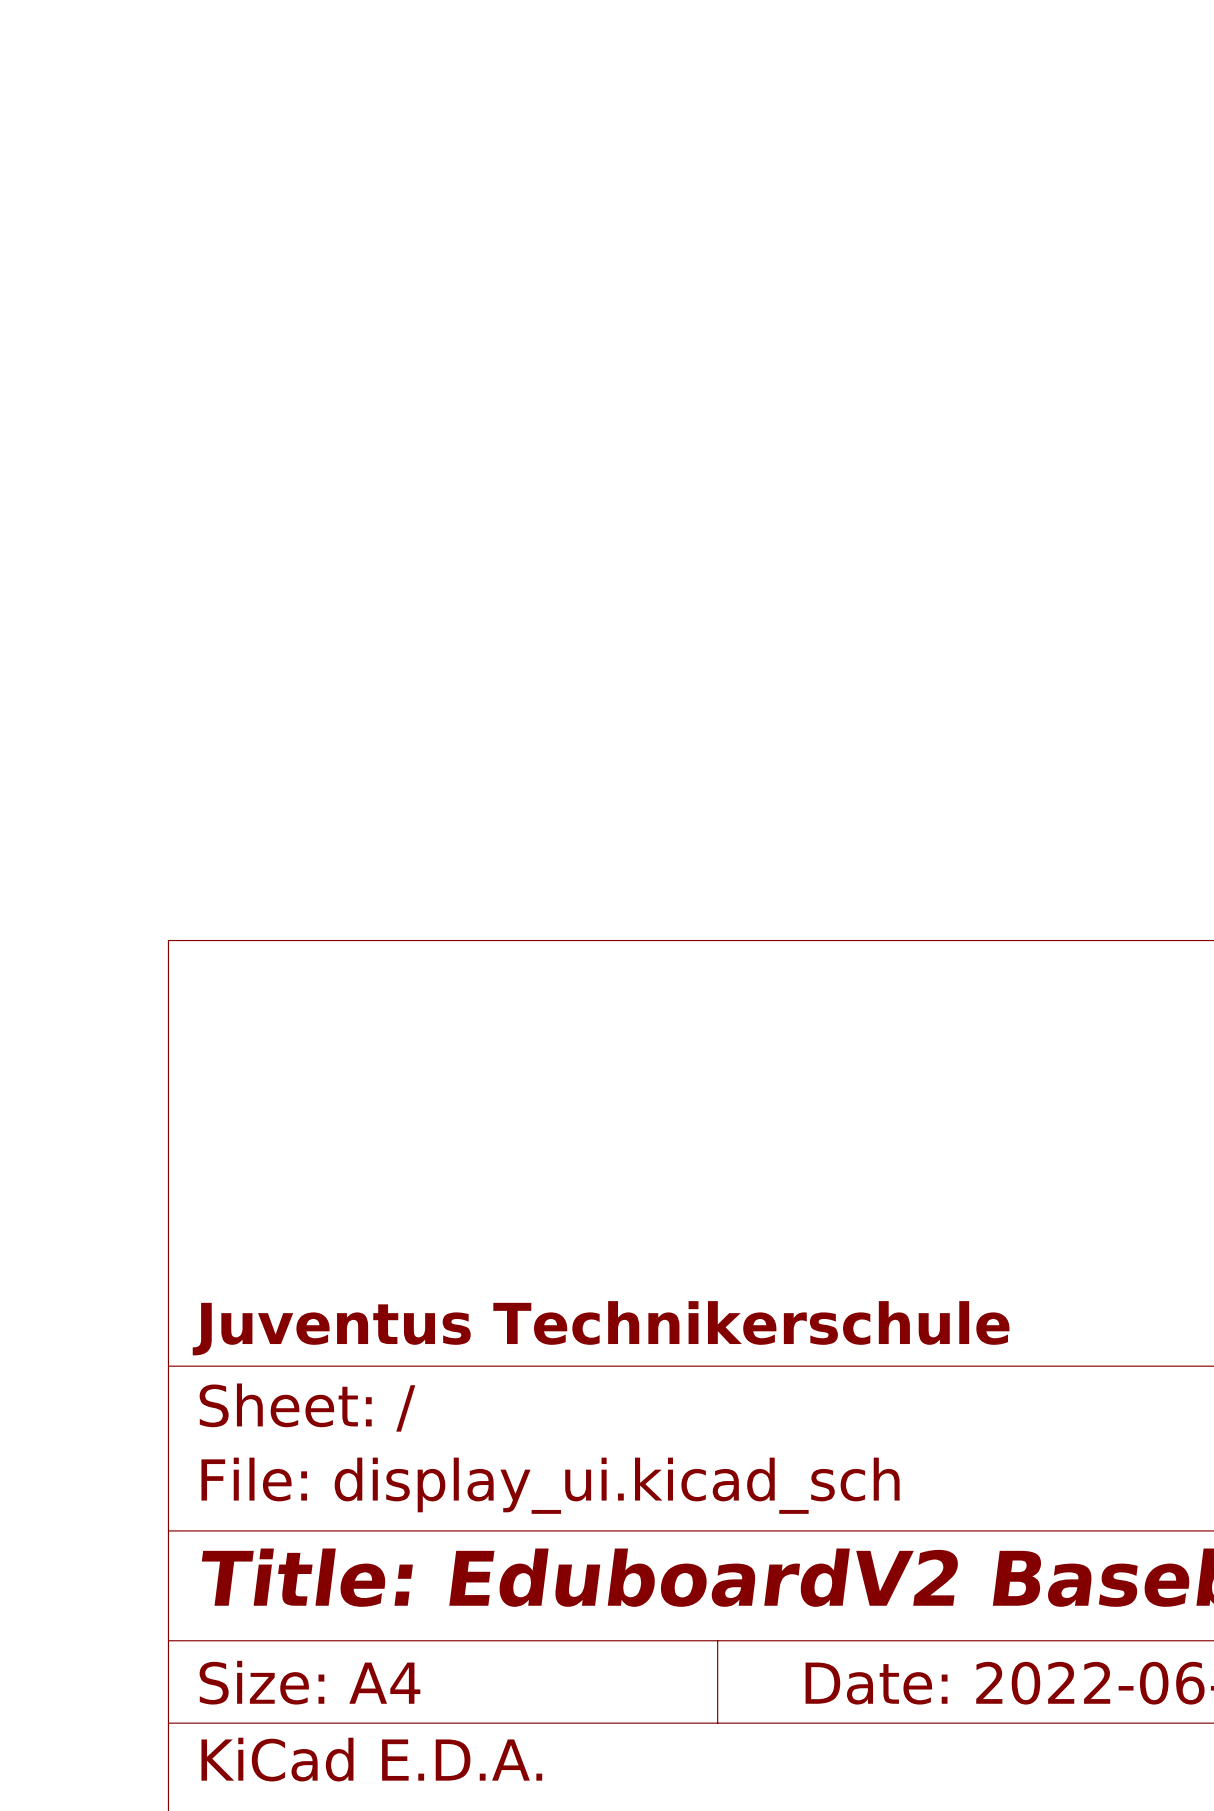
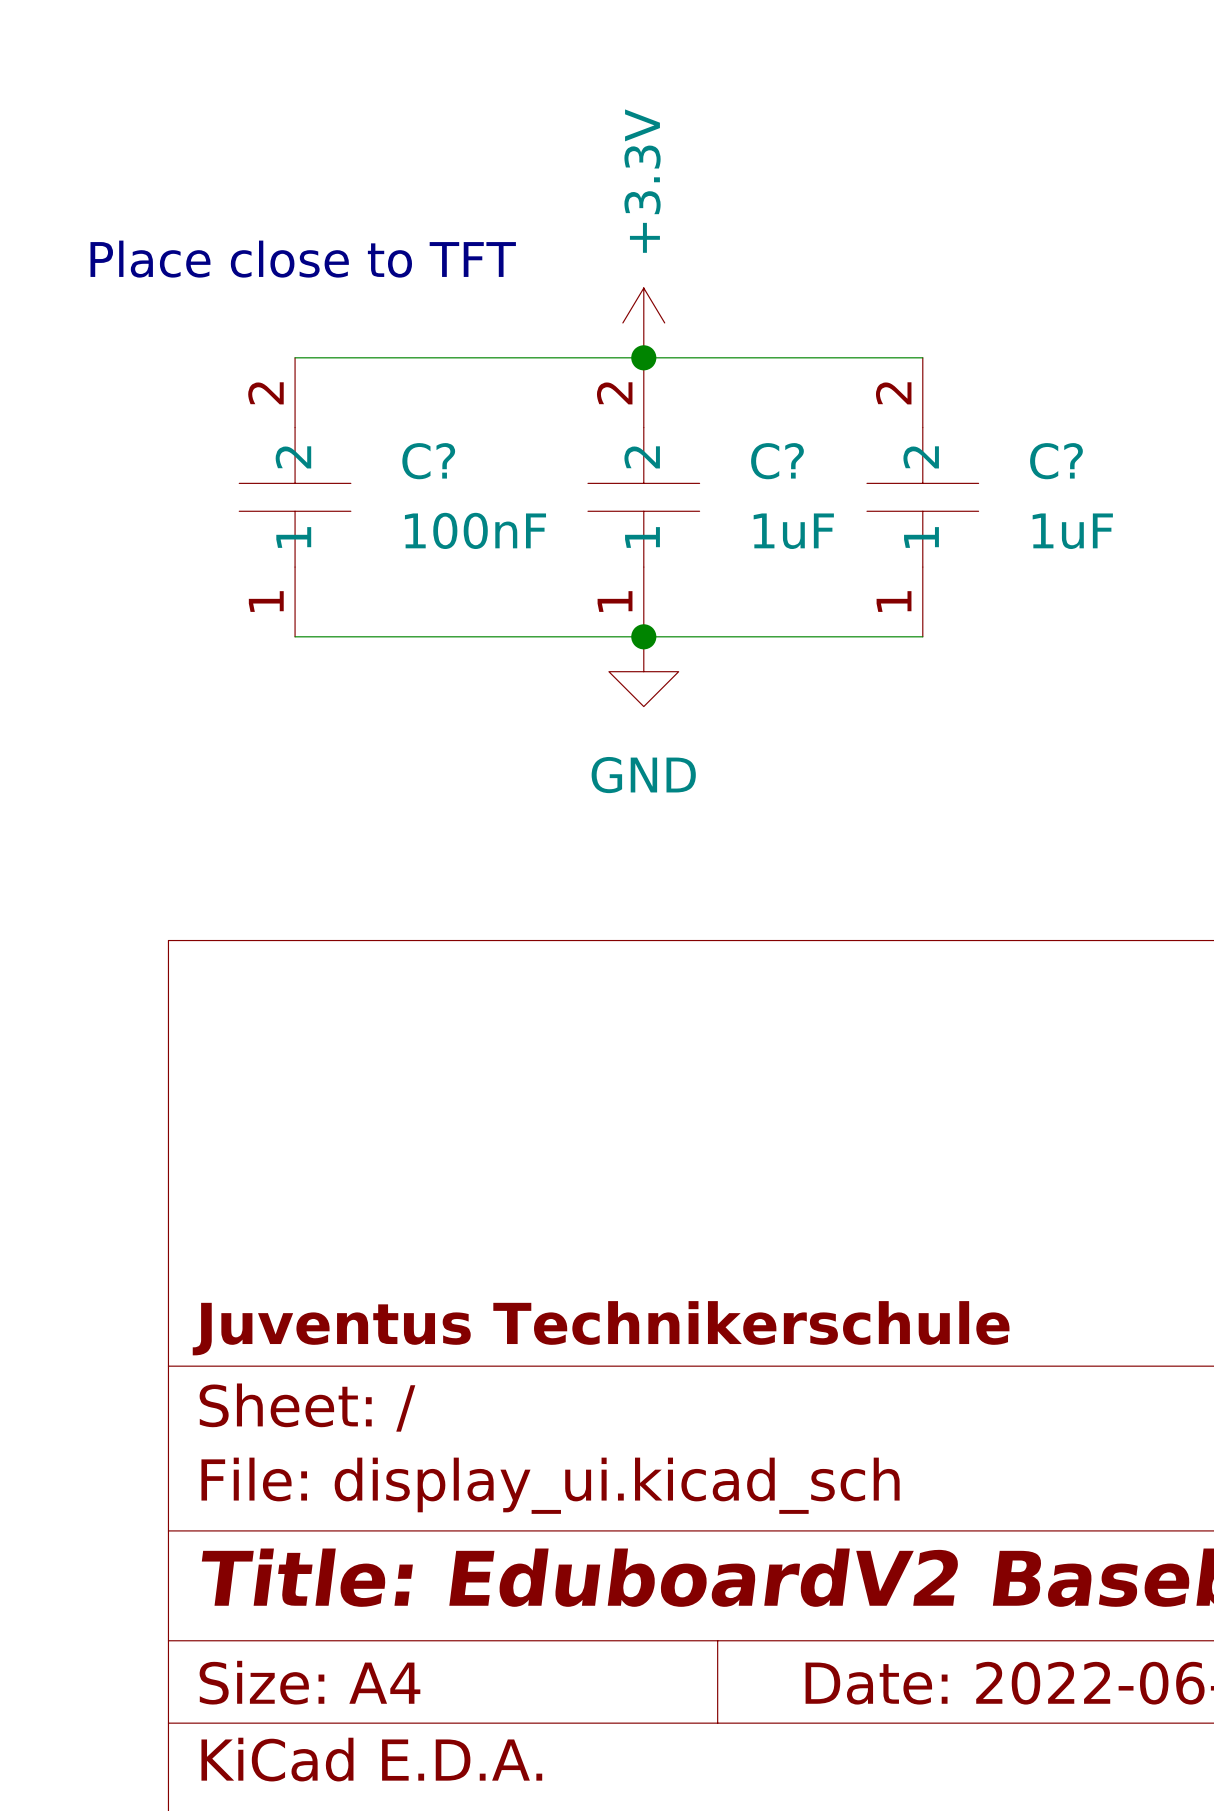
text: none -> Place close to TFT (303, 259)
power symbol: none -> +3.3V (643, 322)
wire: none -> (295, 357) (922, 357)
junction: none -> (643, 357)
C?: none -> 100nF (295, 497)
C?: none -> 1uF (643, 497)
C?: none -> 1uF (922, 497)
wire: none -> (295, 636) (922, 636)
junction: none -> (643, 636)
power symbol: none -> GND (643, 671)

